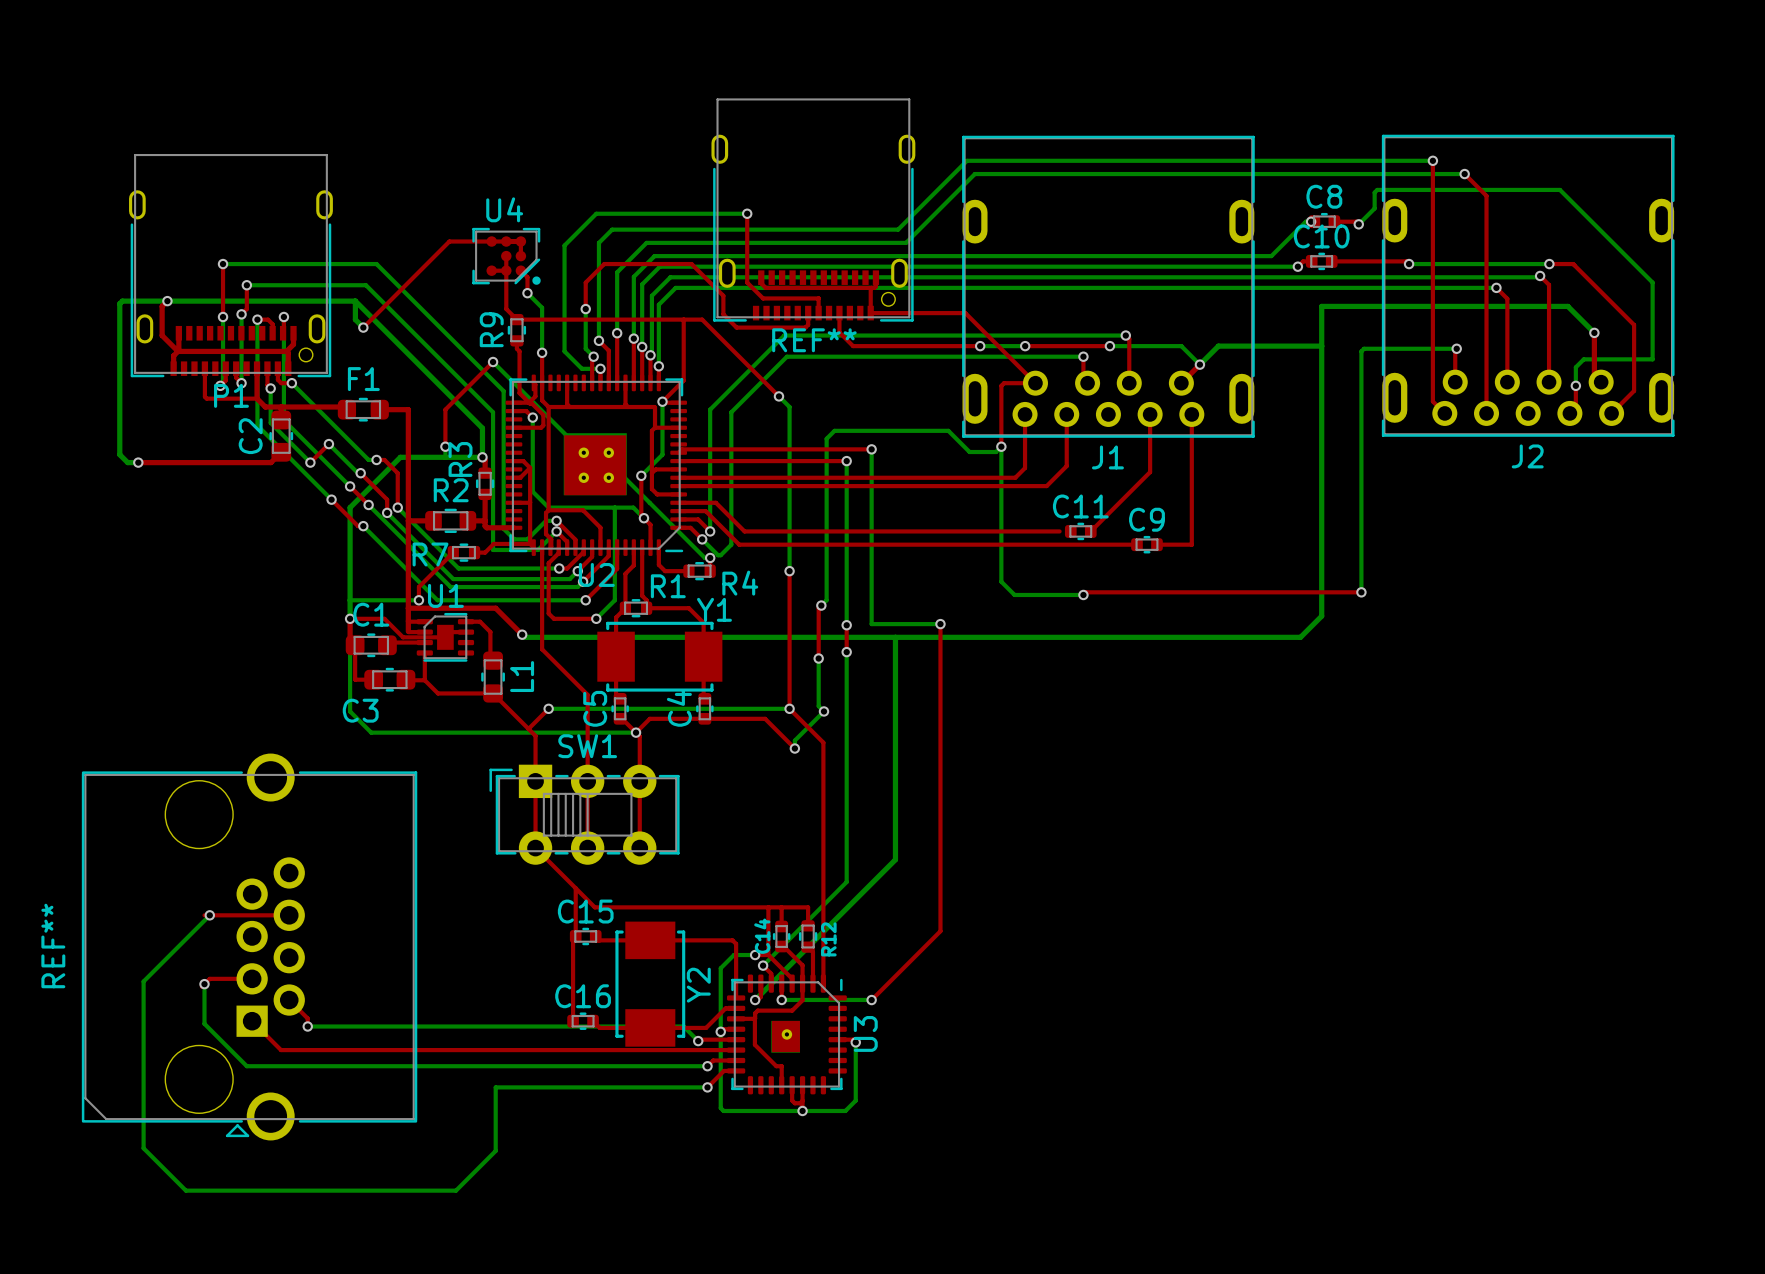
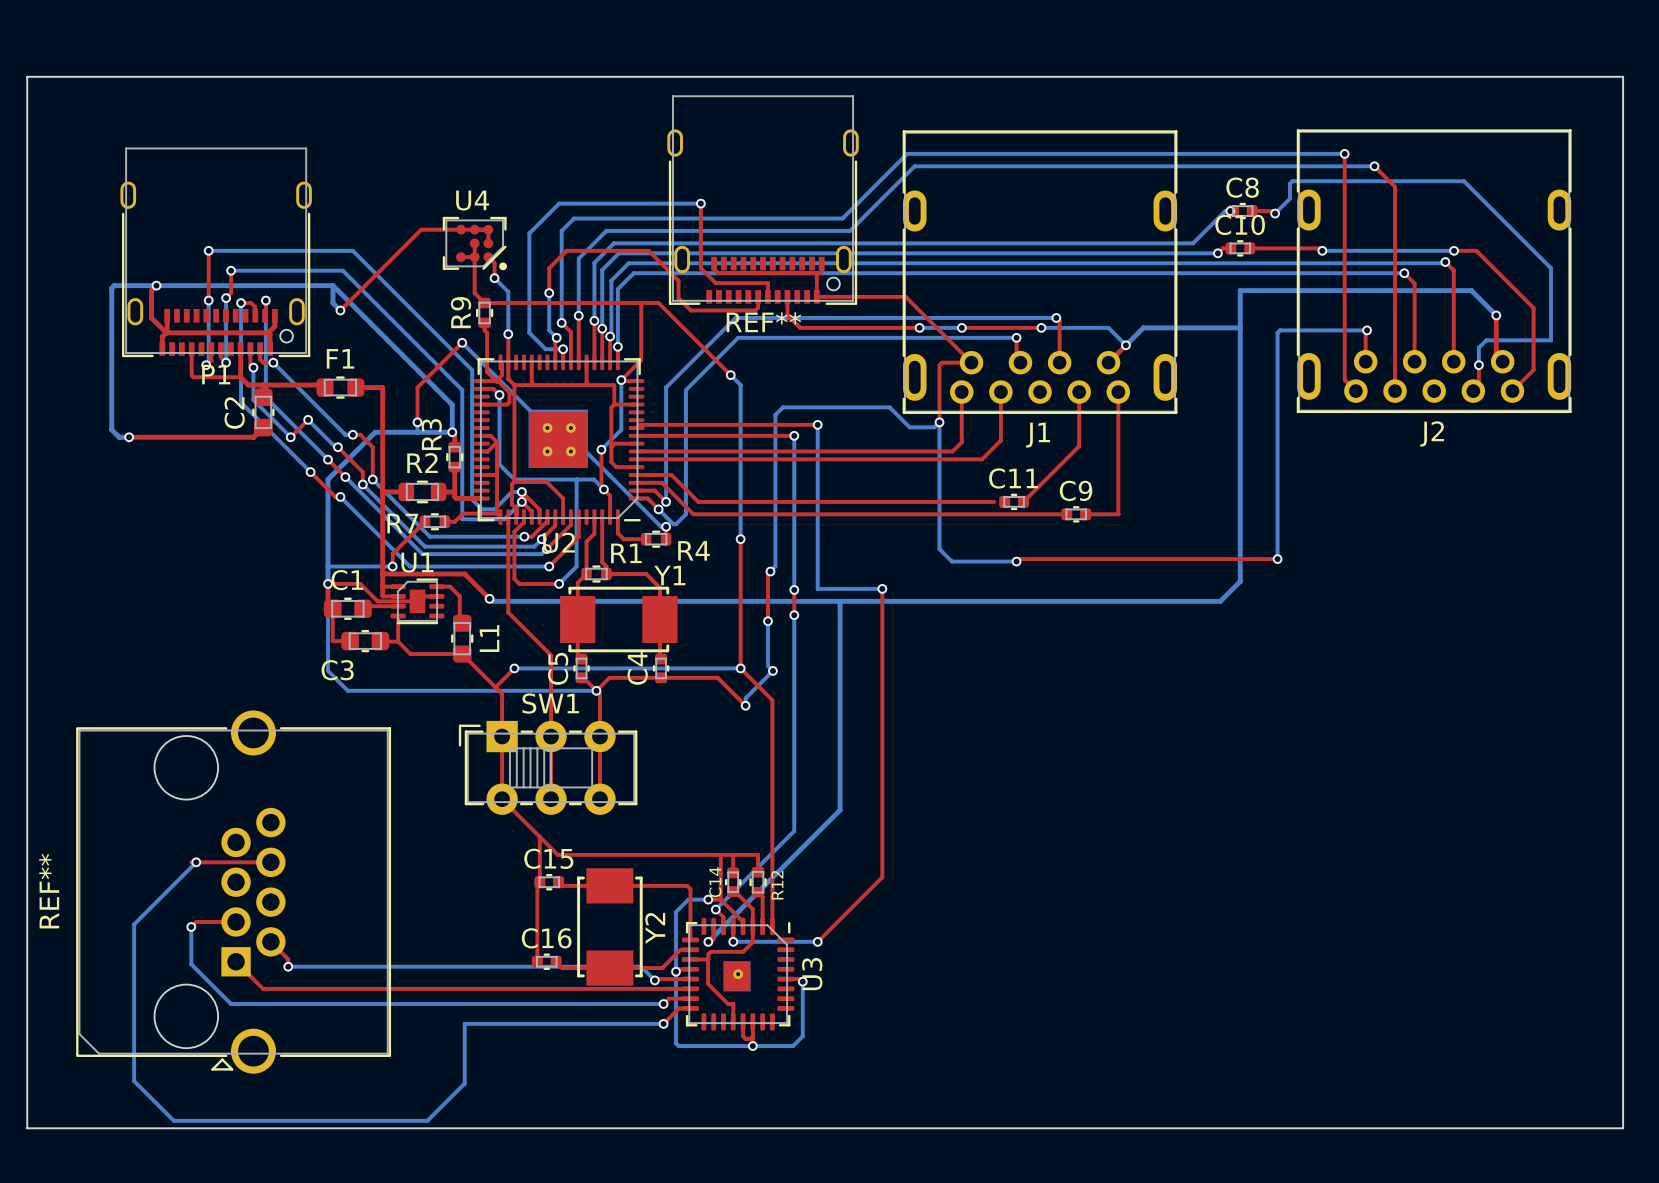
board edge: none -> (27, 76) (1623, 76) (1623, 1128) (27, 1128) (27, 76)

